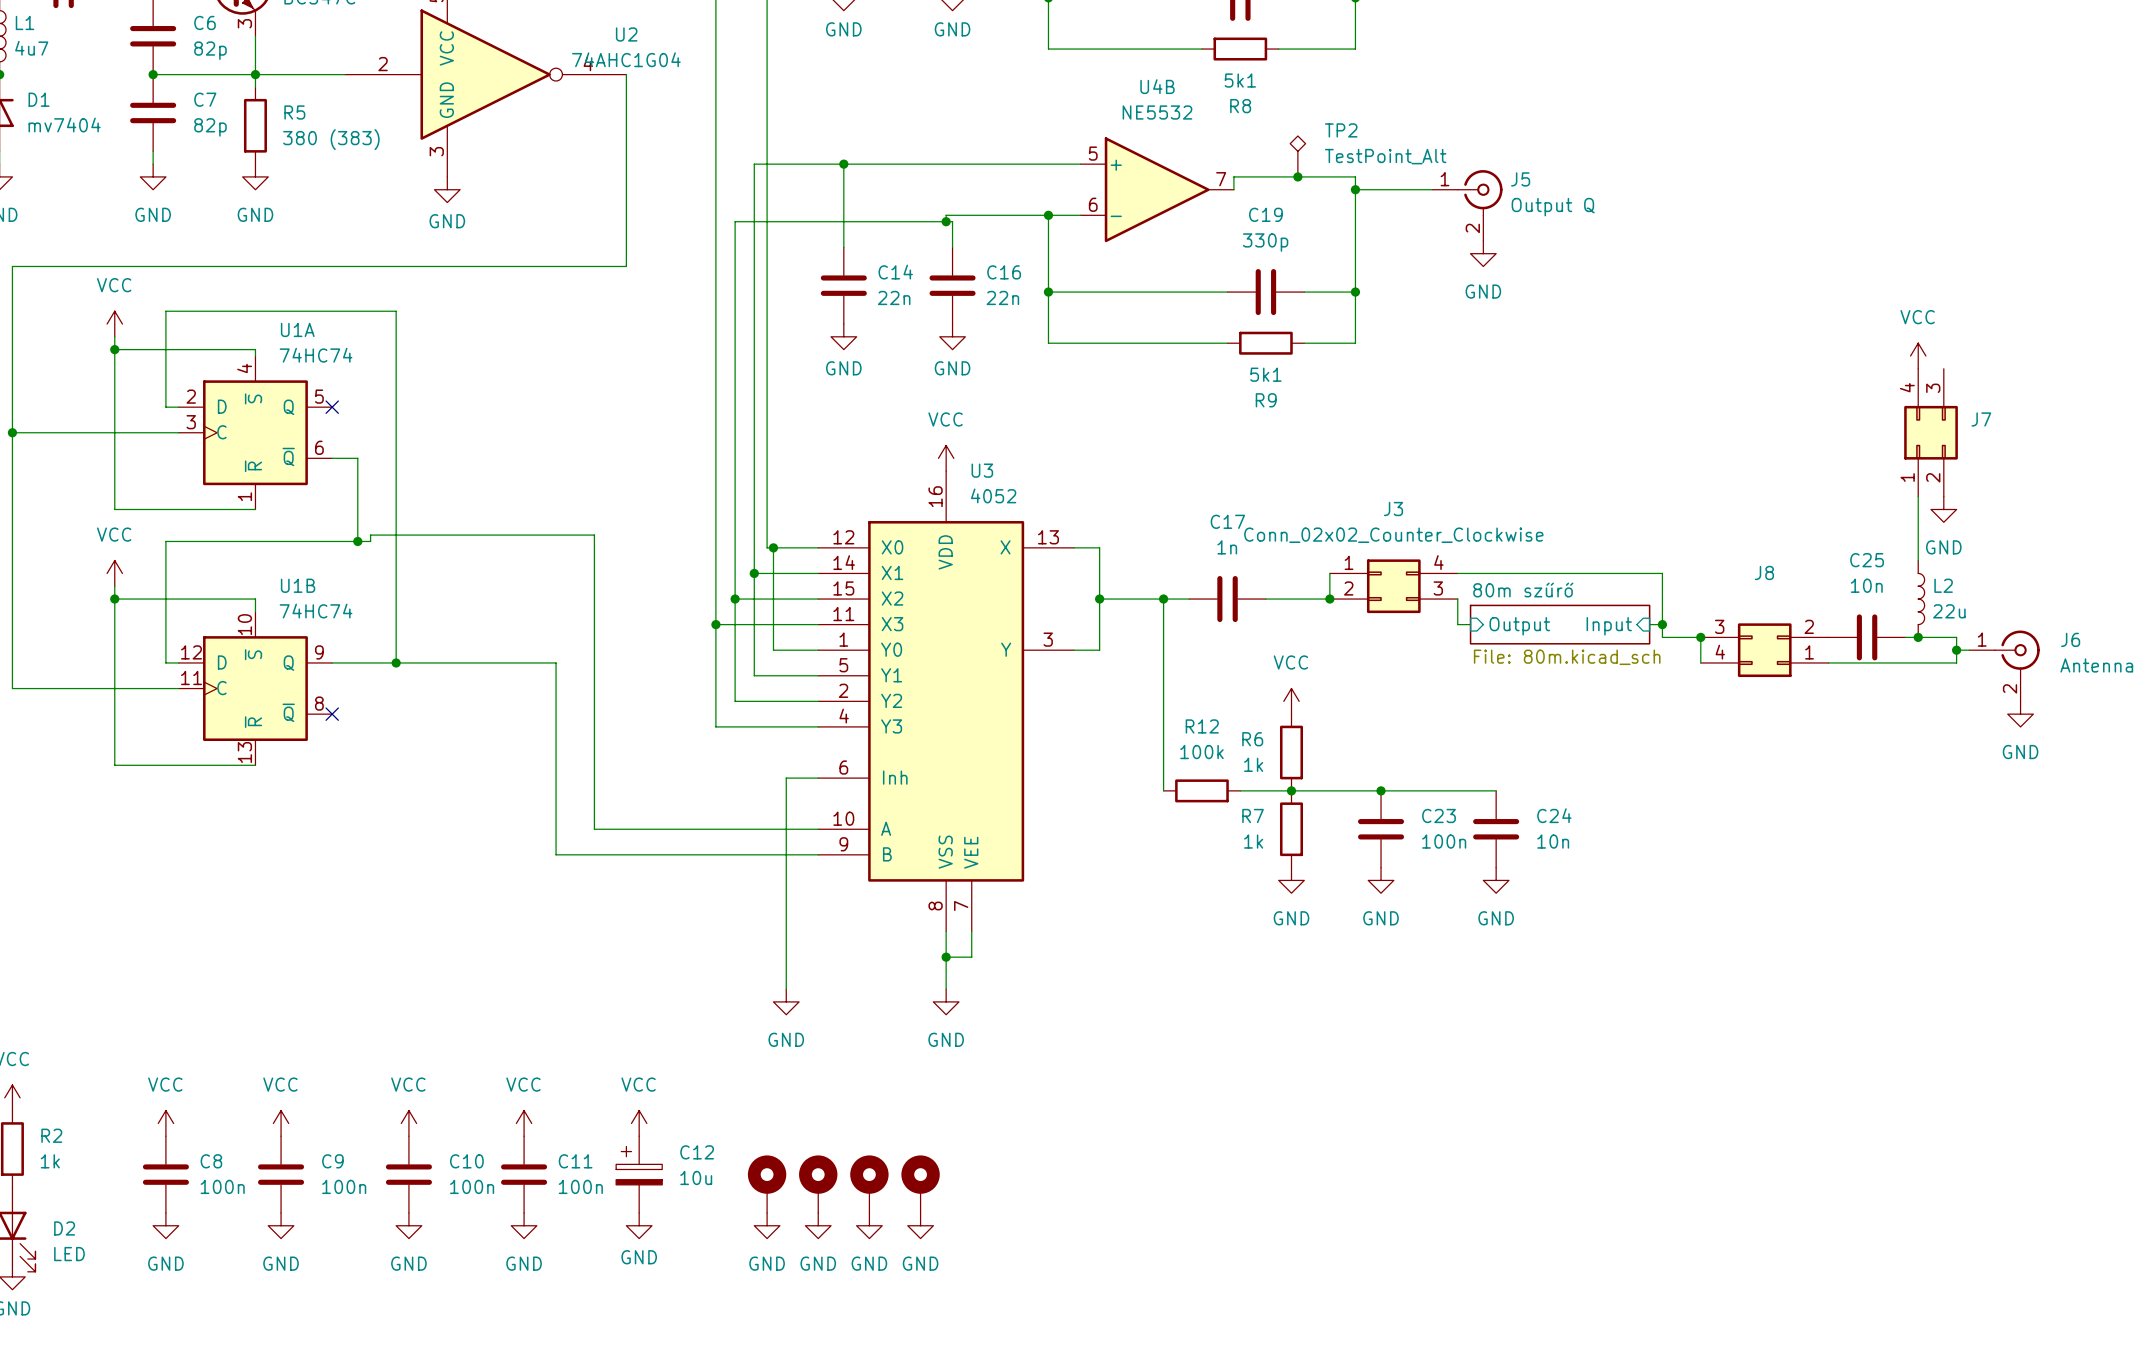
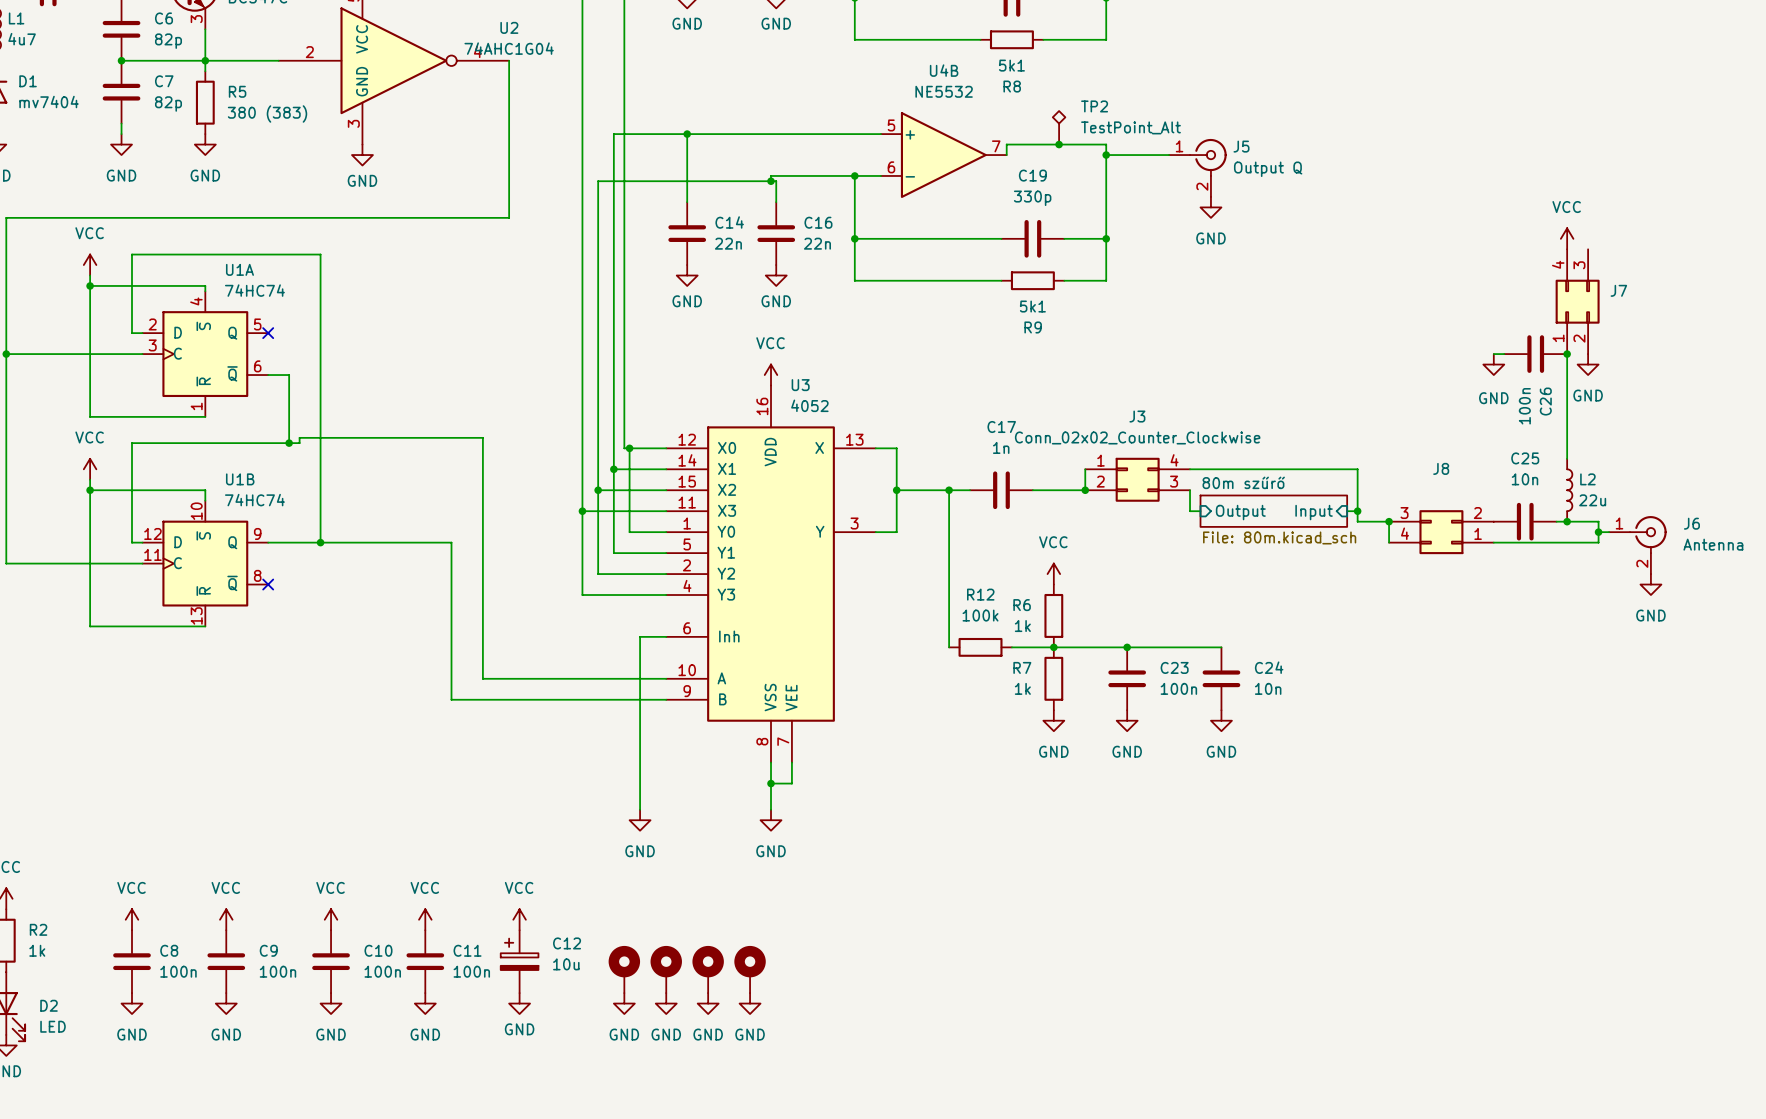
power symbol position: VCC (1918, 356) -> VCC (1567, 238)
wire: none -> (1493, 354) (1504, 354)
C26: none -> 100n (1535, 354)
junction: none -> (1567, 354)
J7 position: (1931, 432) -> (1577, 301)
power symbol: none -> GND (1493, 364)
power symbol position: GND (1943, 509) -> GND (1588, 364)

